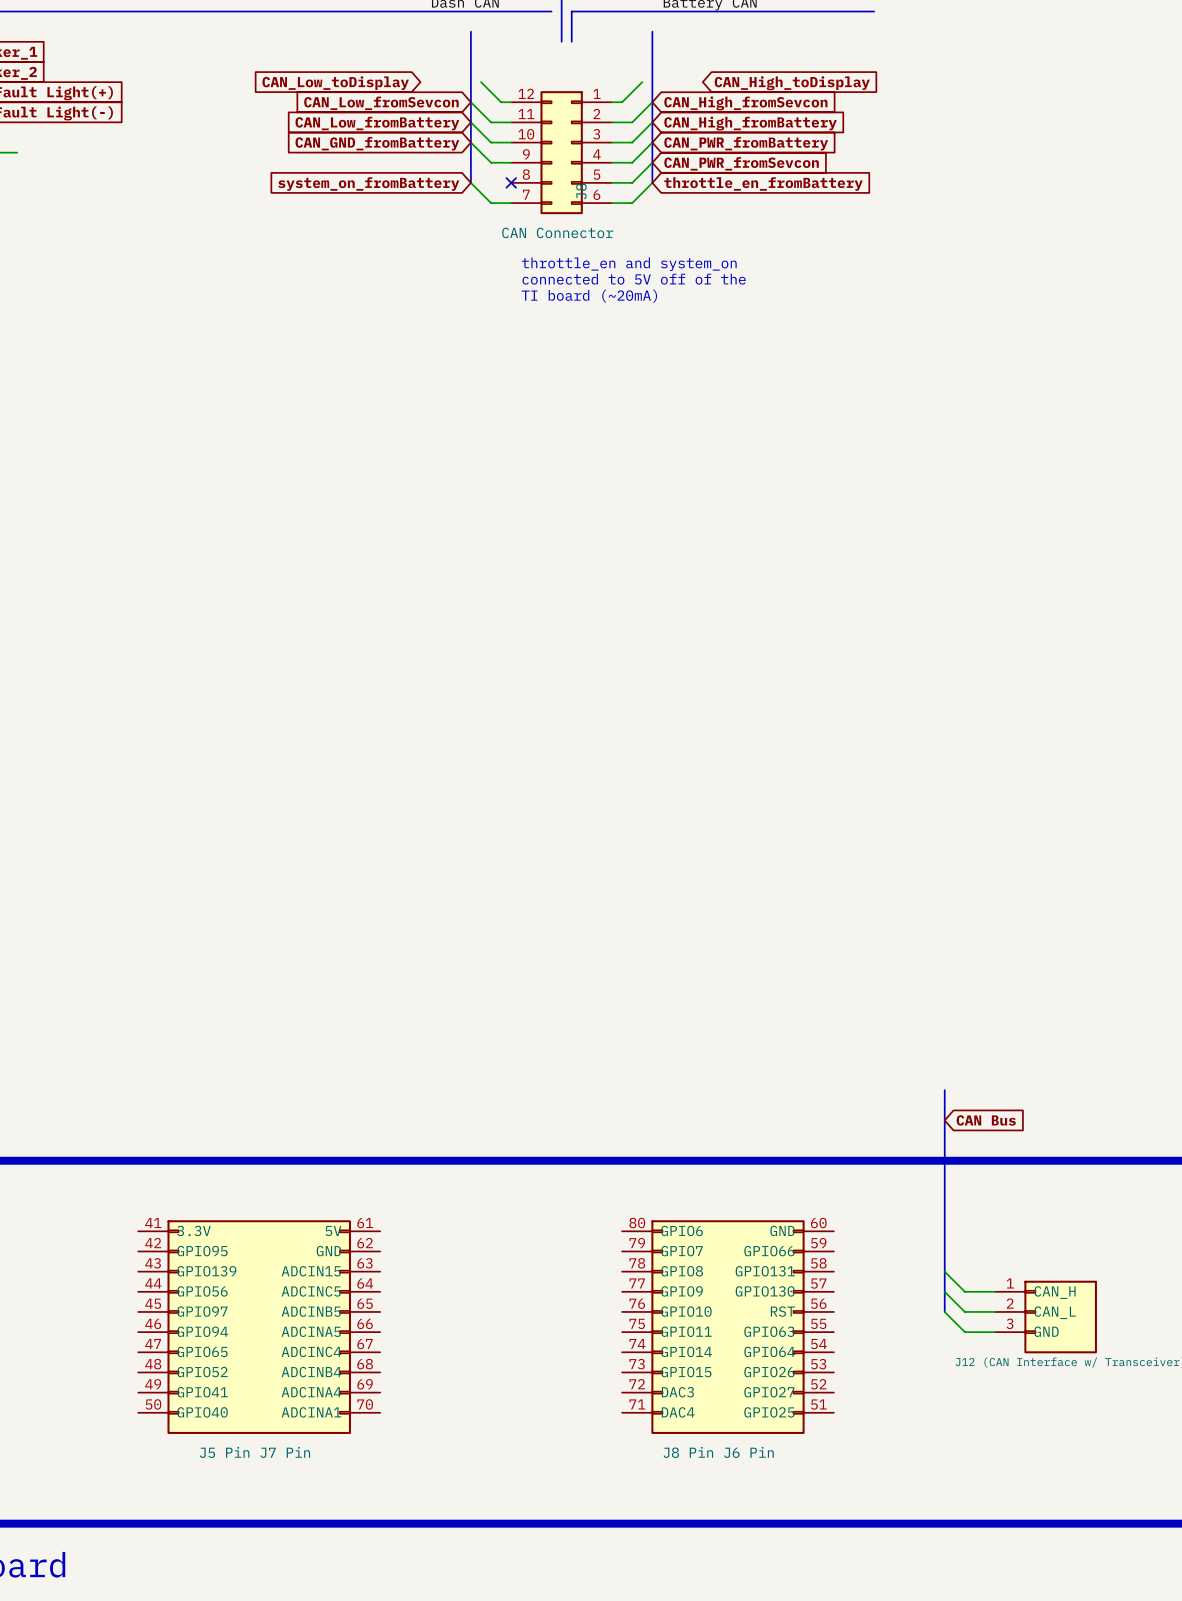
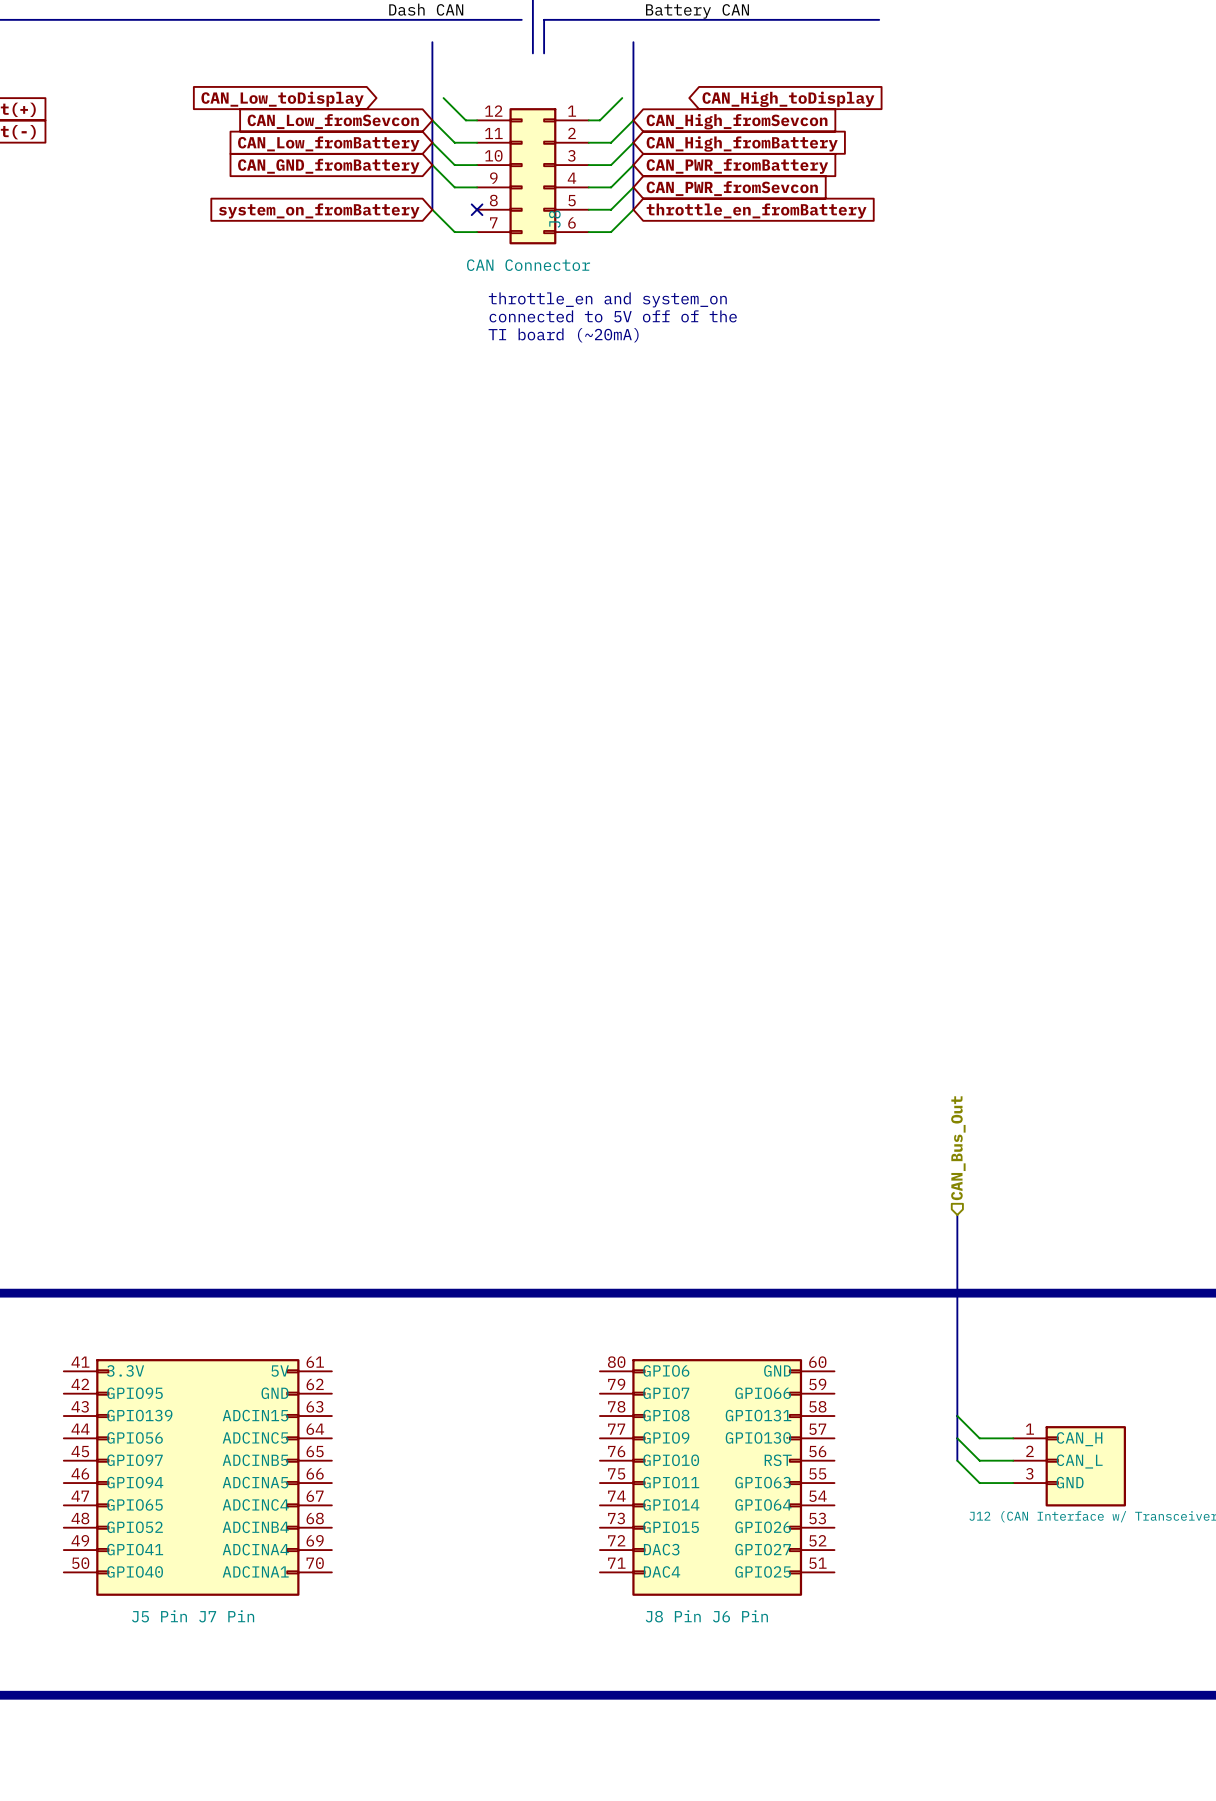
hierarchical label: none -> CAN_Bus_Out (958, 1148)
global label: CAN Bus (986, 1120) -> none

